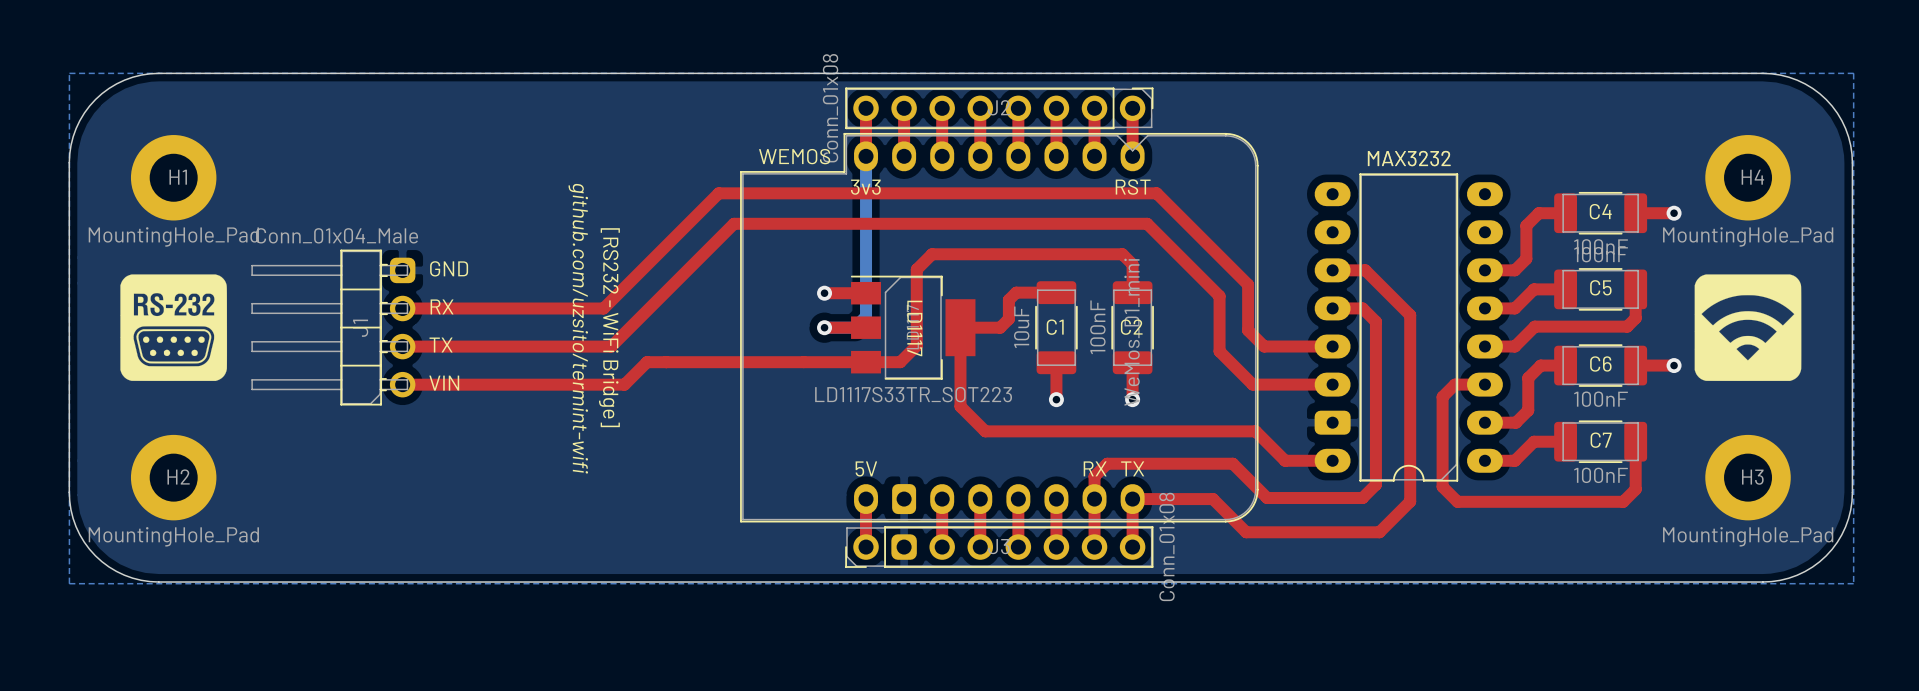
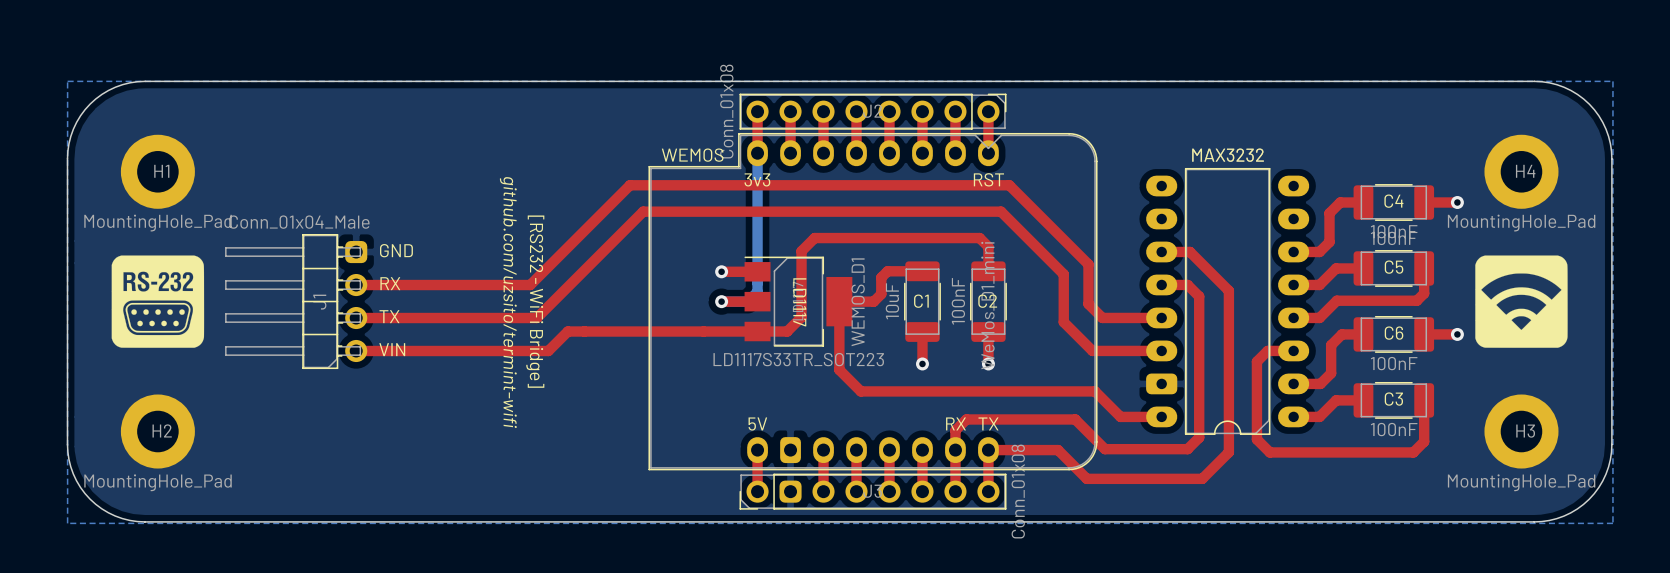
WEMOS name: WEMOS (794, 156) -> WEMOS_D1 (858, 302)
text: none -> WEMOS (692, 155)
C7 name: C7 (1601, 440) -> C3 (1393, 399)

